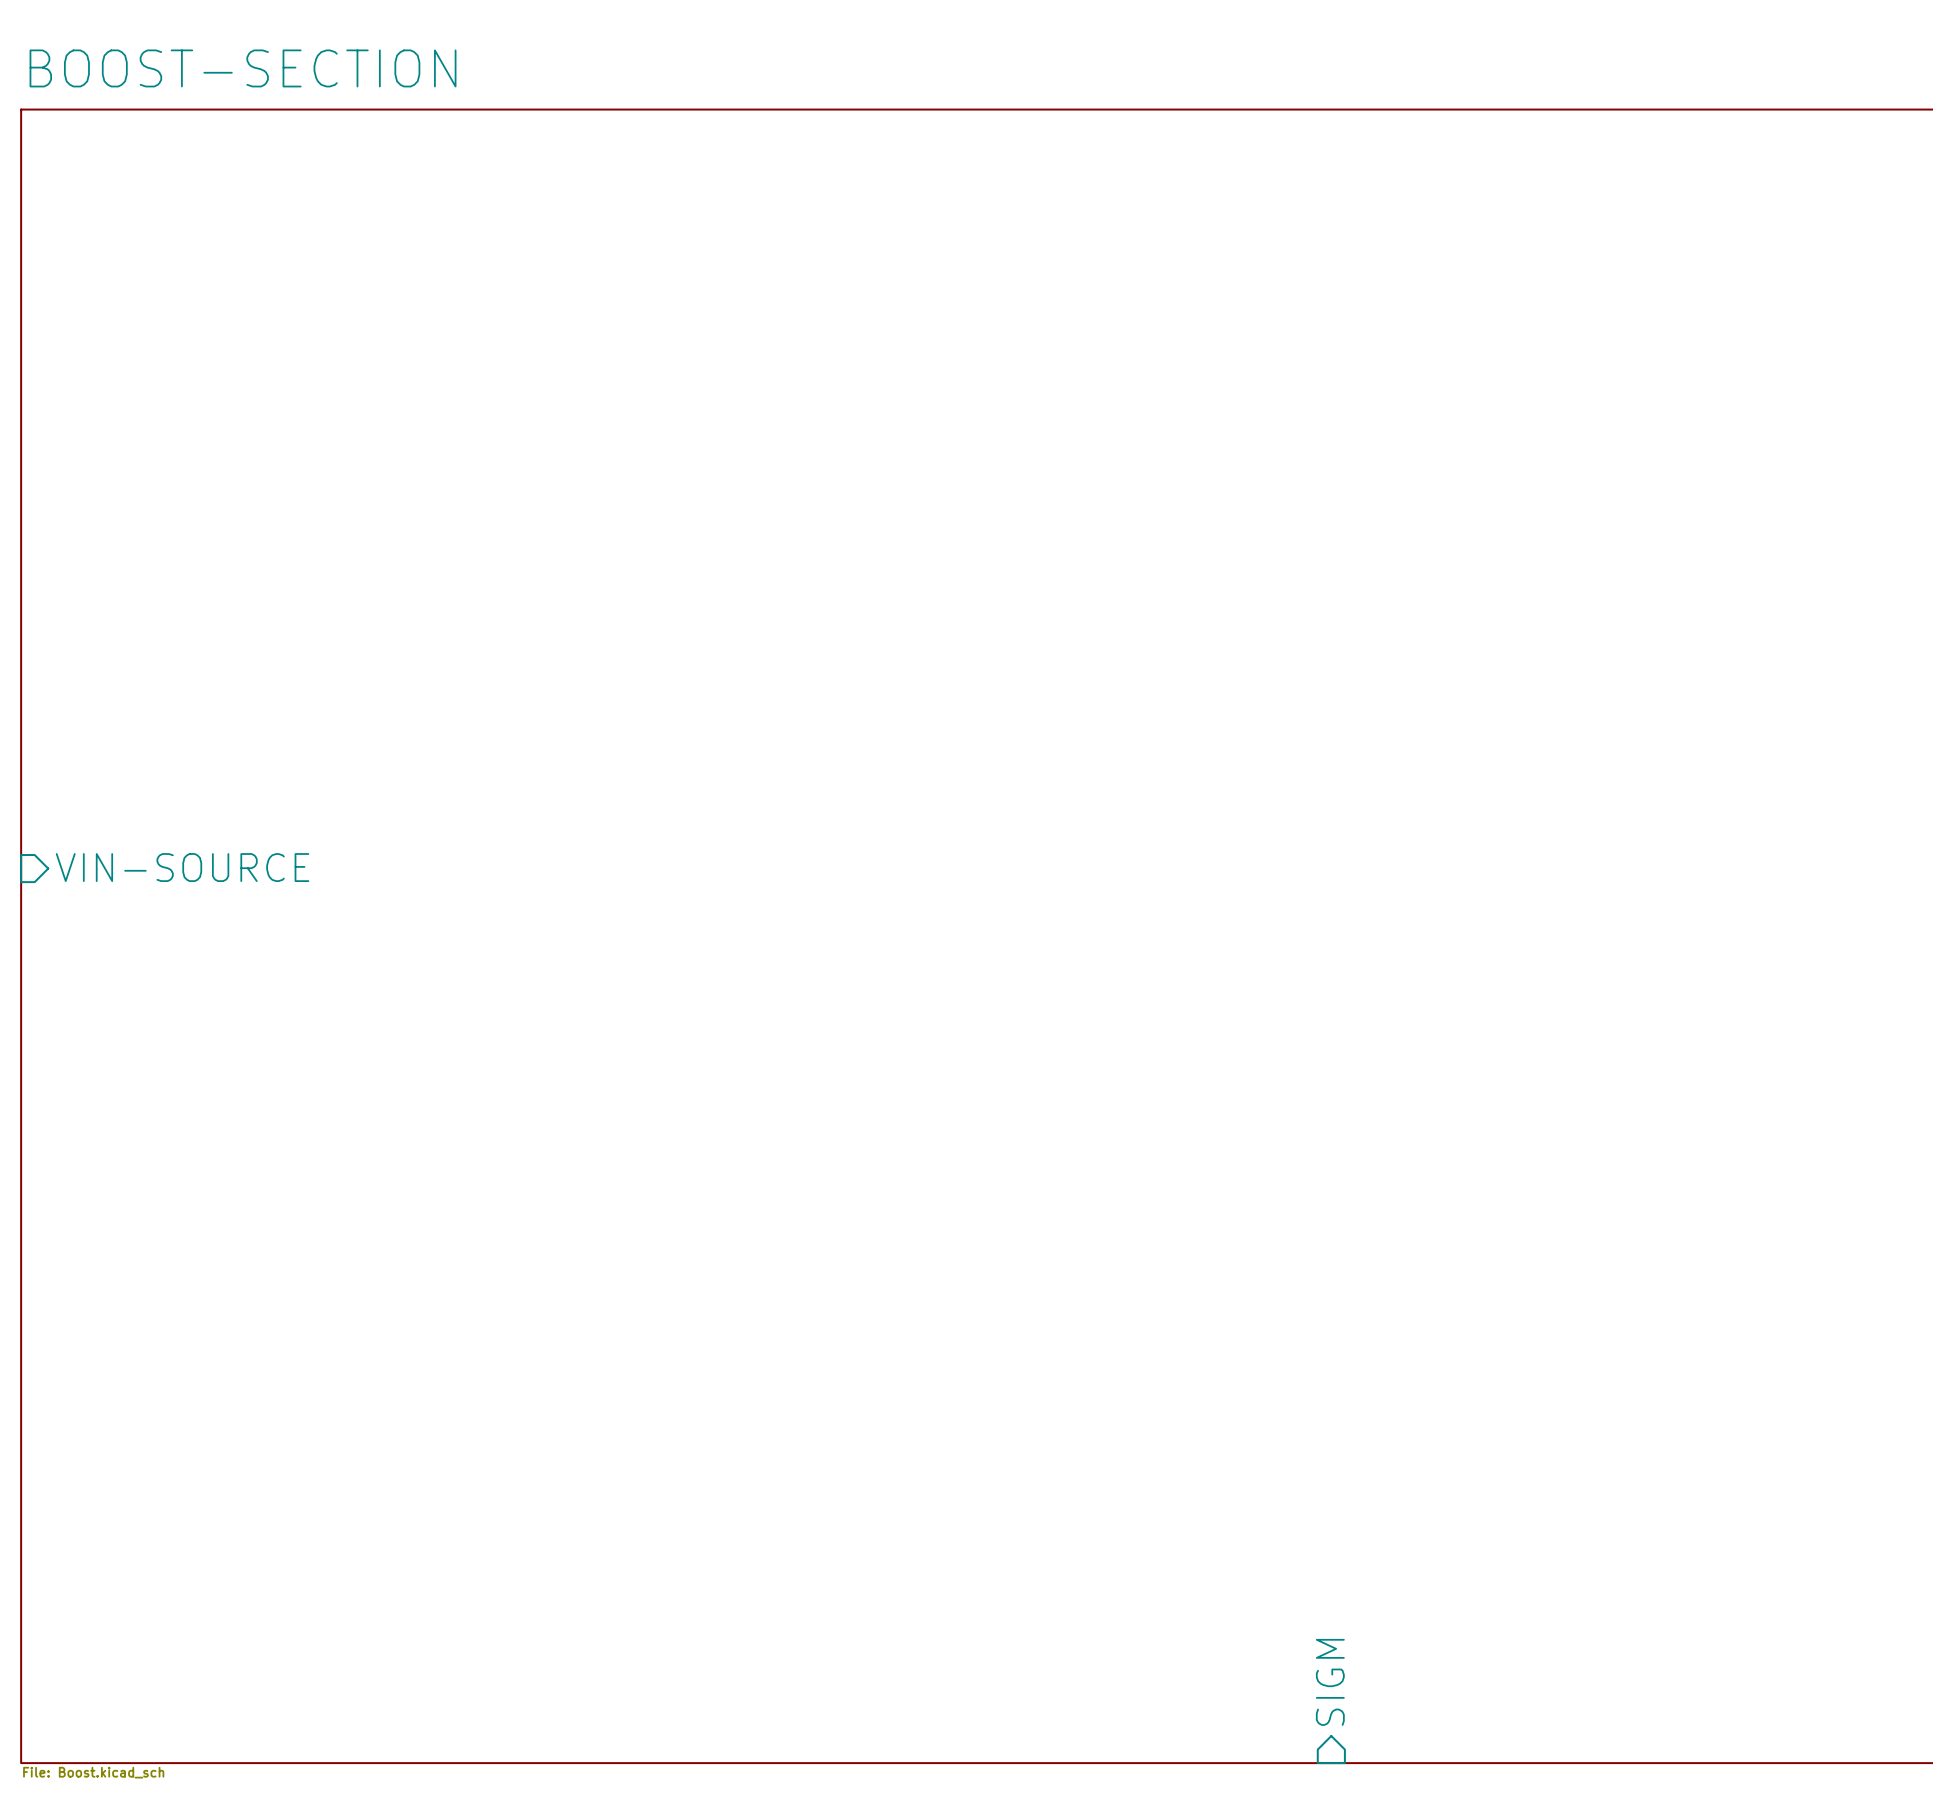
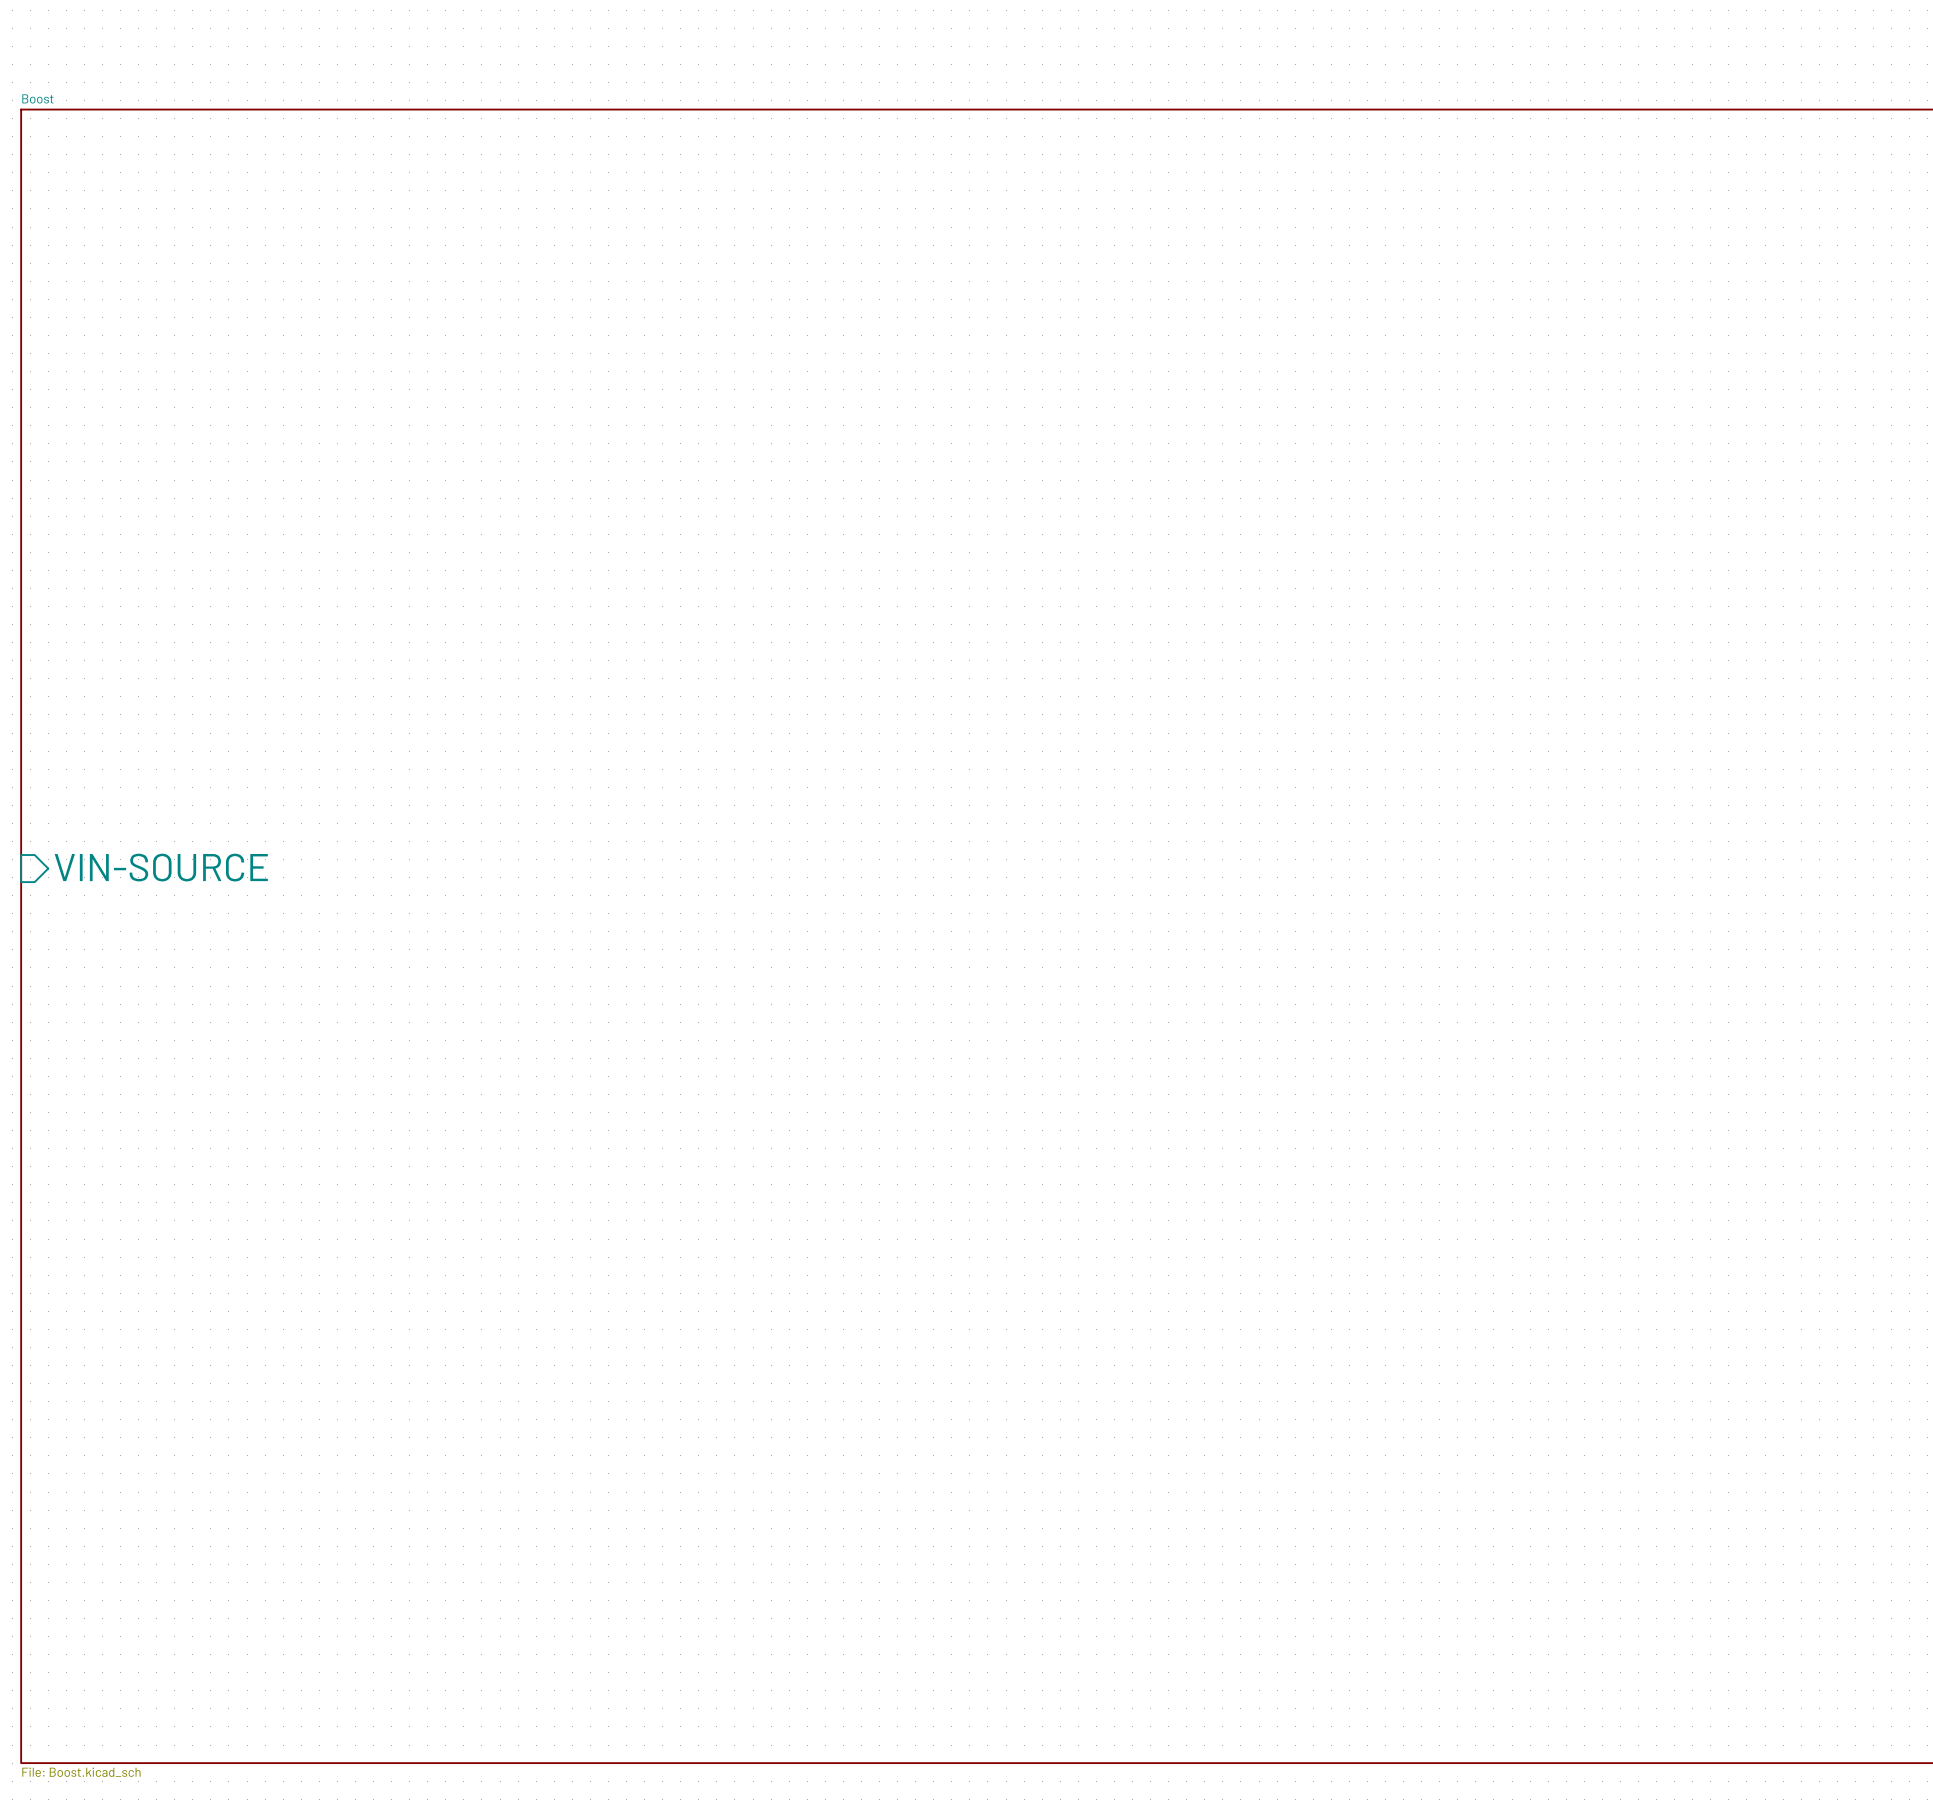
sheet BOOST-SECTION name: BOOST-SECTION (243, 68) -> Boost (37, 98)
sheet pin: SIGM (1330, 1682) -> none

